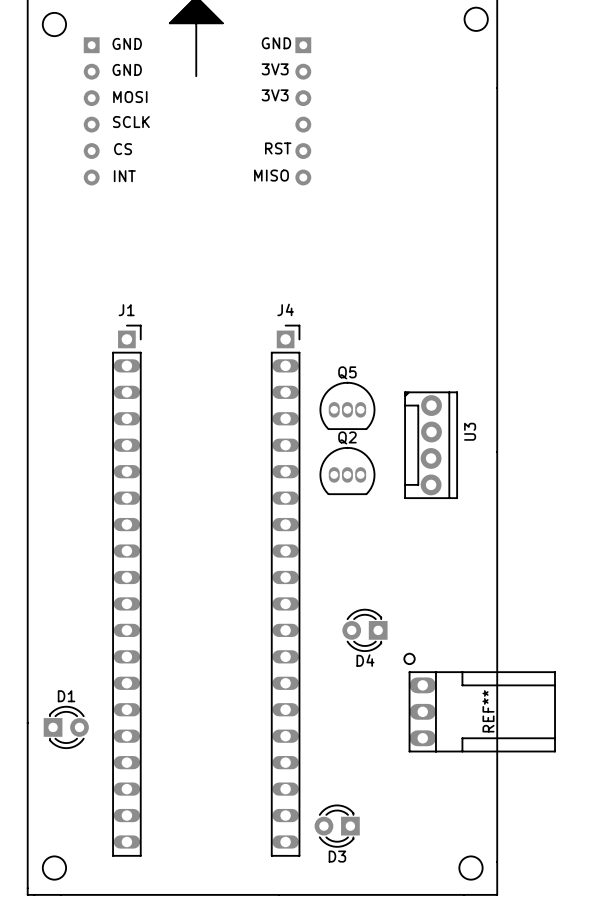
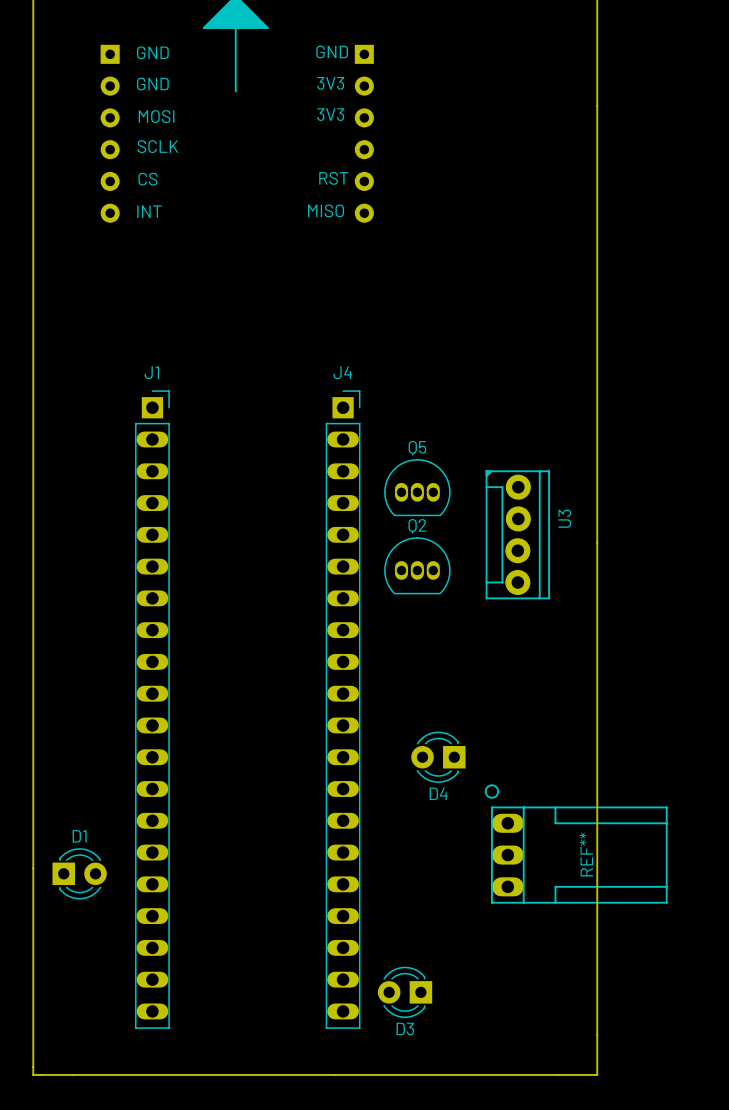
round board edge: [463, 6, 489, 32] -> none
round board edge: [42, 12, 67, 37] -> none
round board edge: [42, 855, 67, 881] -> none
round board edge: [458, 855, 484, 881] -> none

